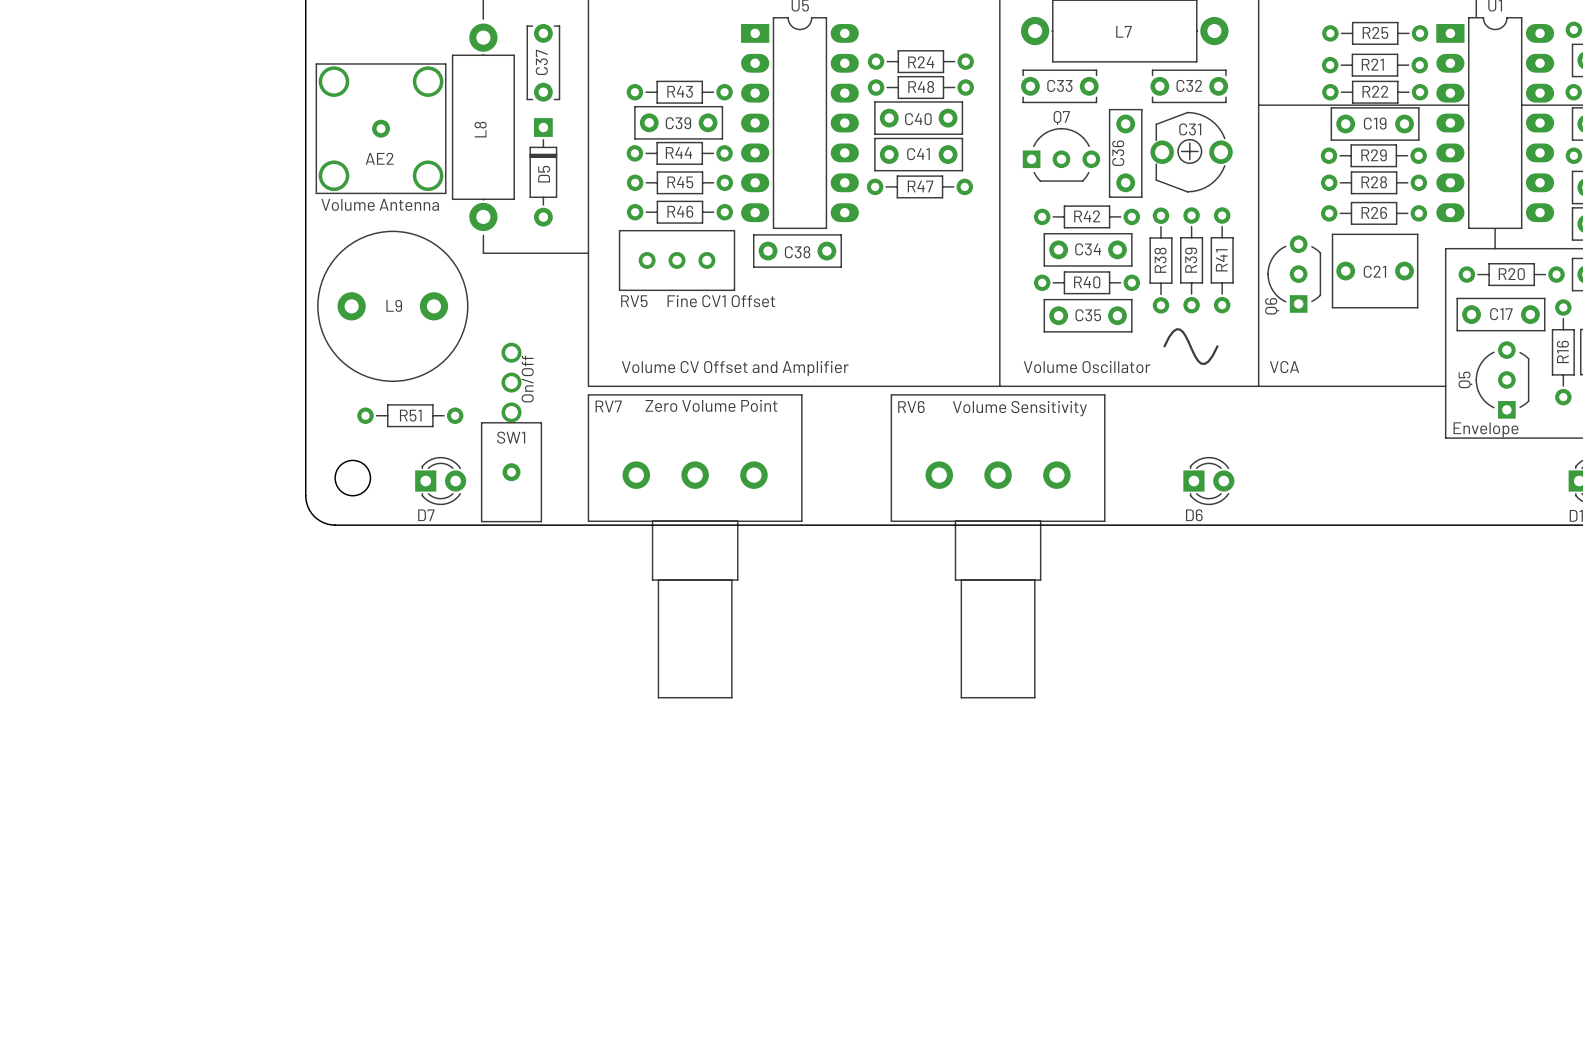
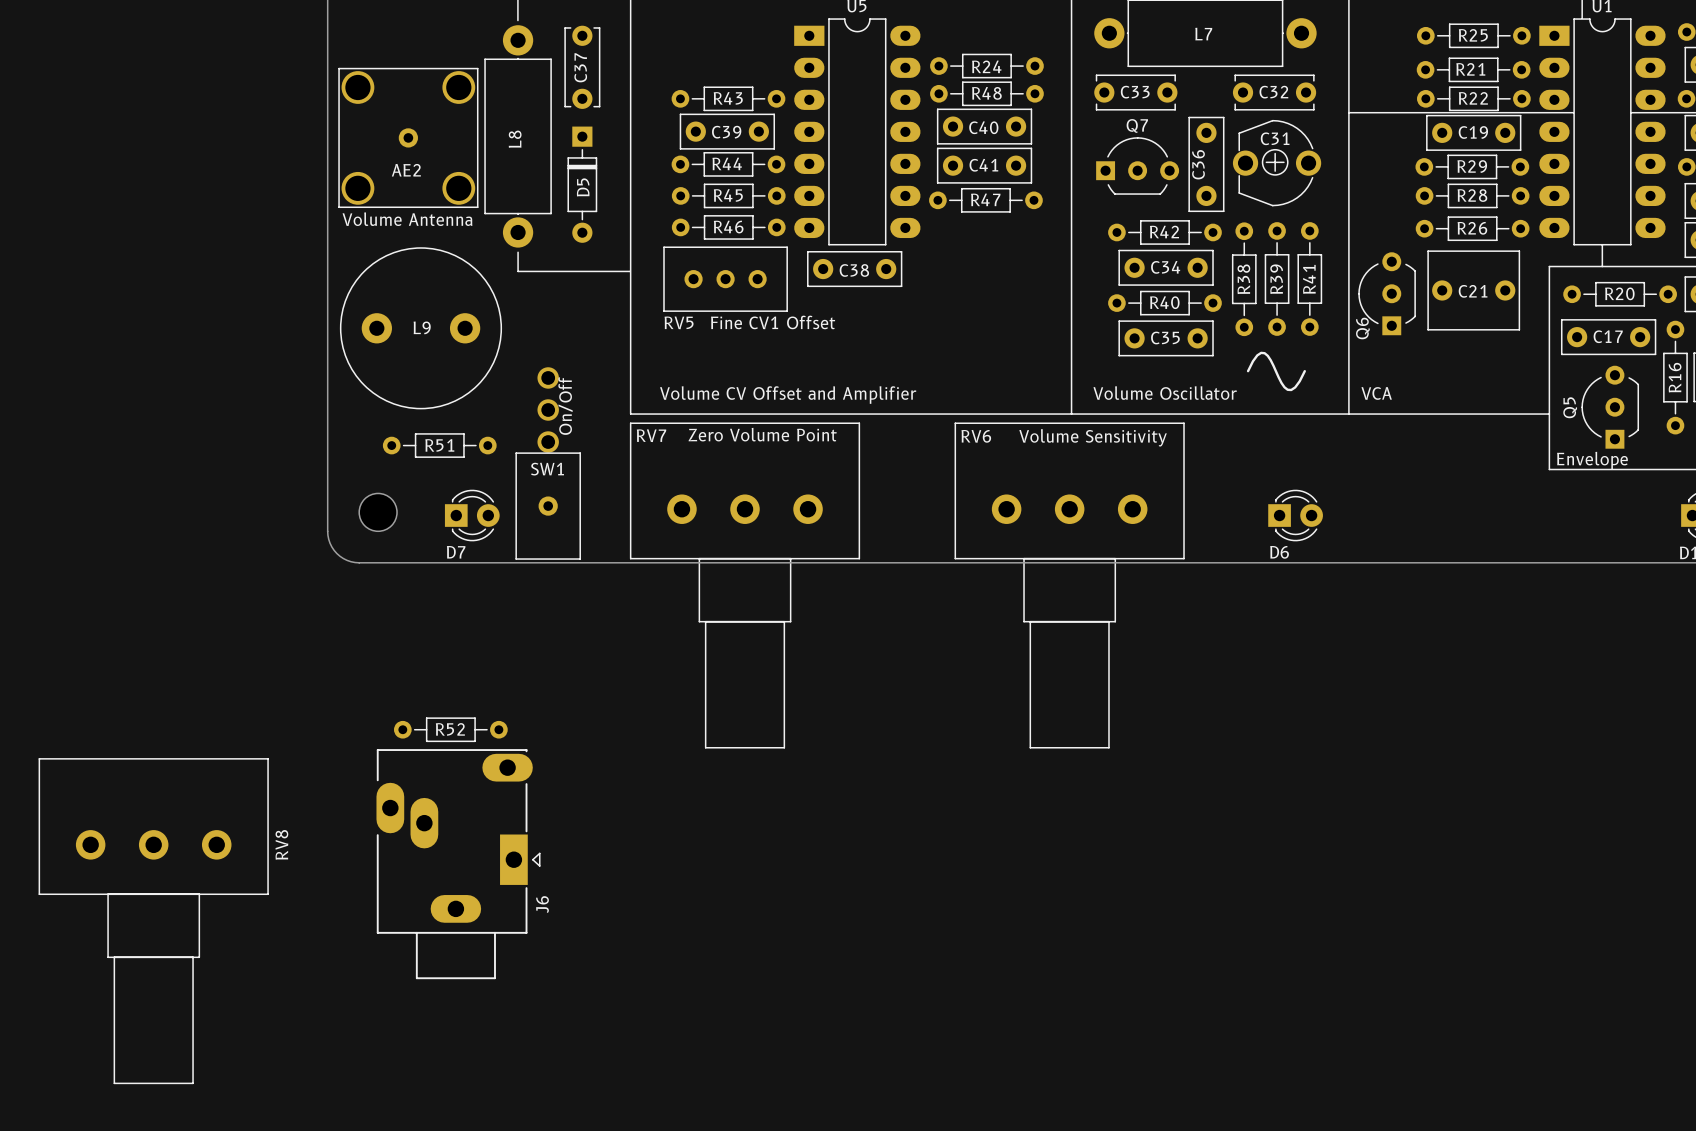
R52: none -> (450, 729)
J6: none -> (458, 864)
RV8: none -> (153, 921)

